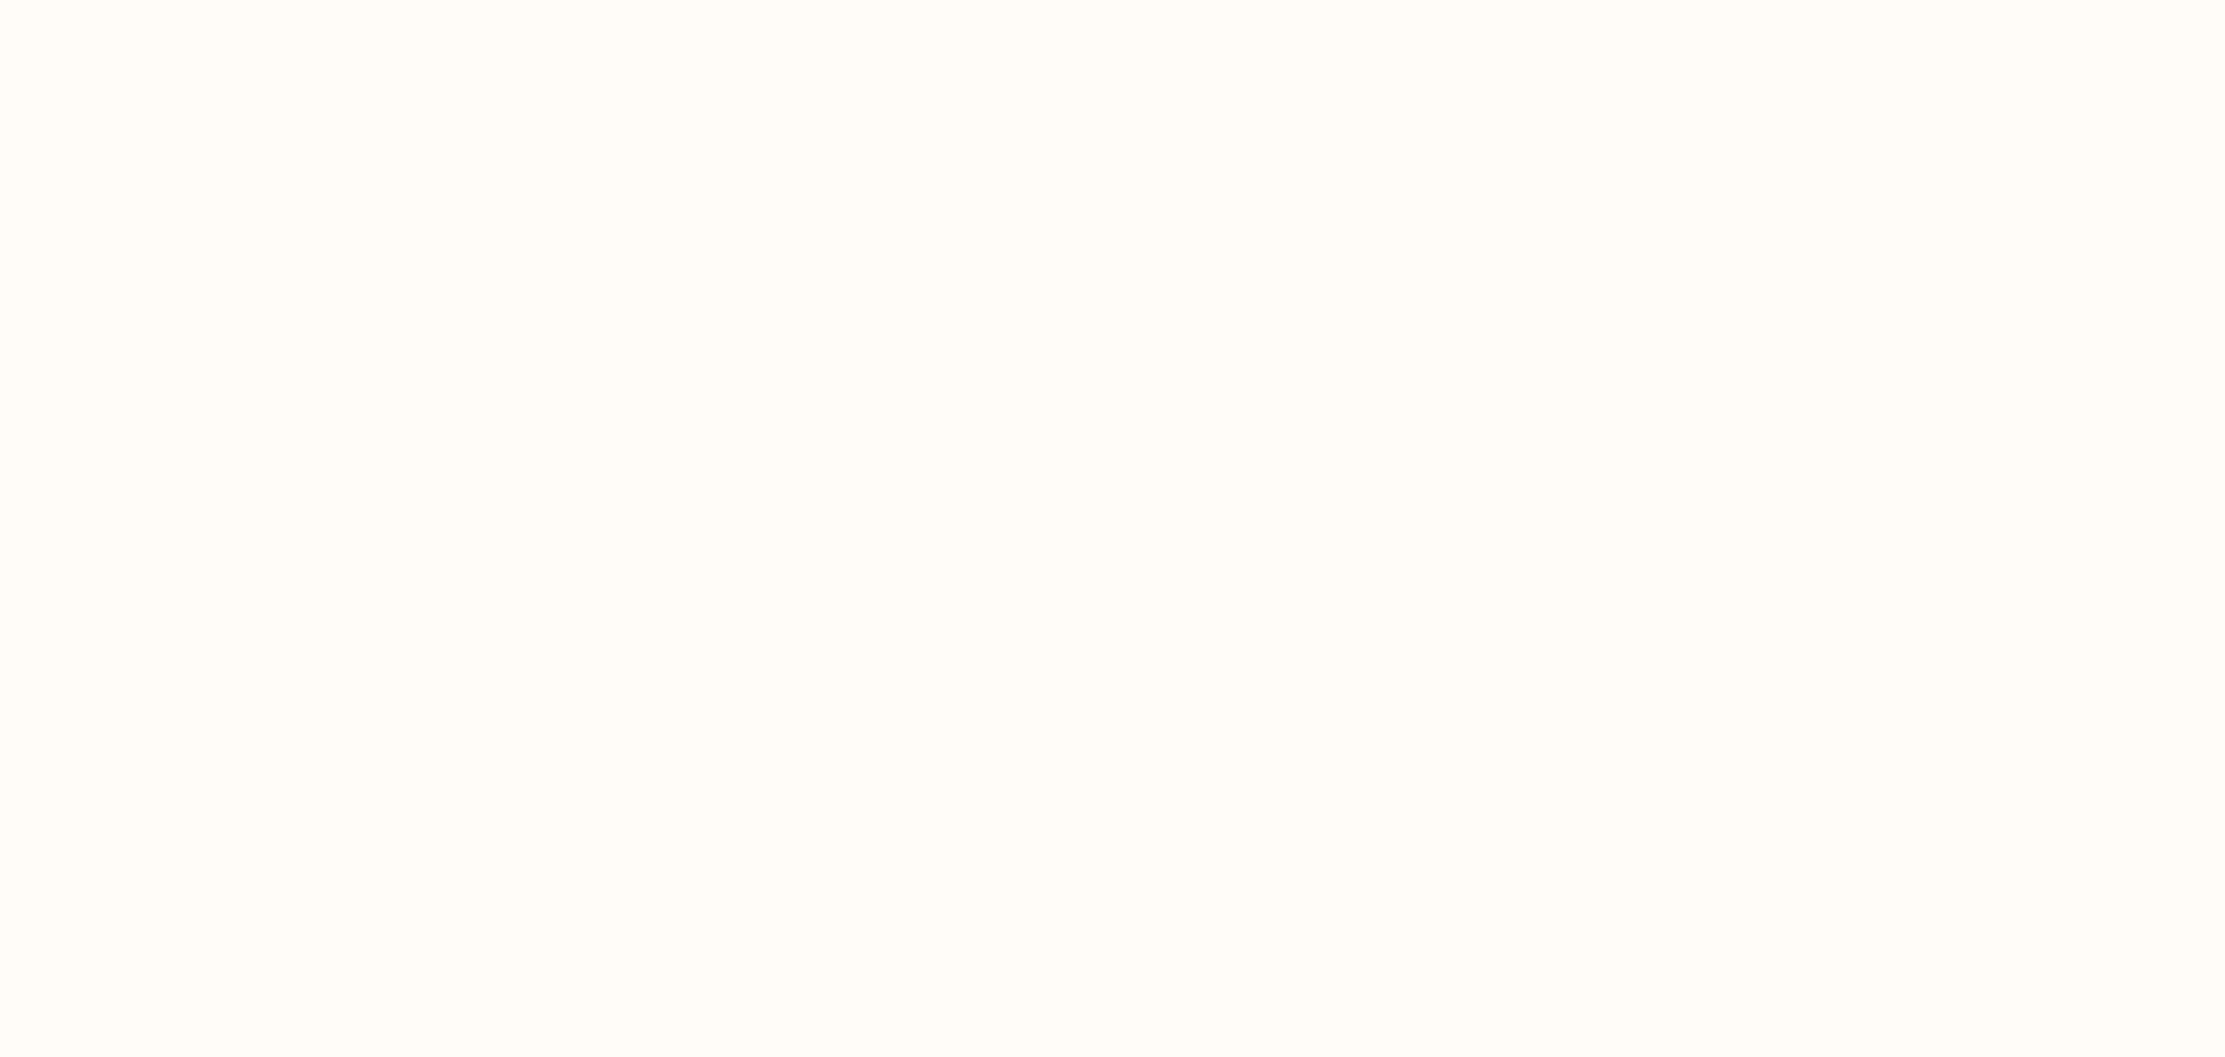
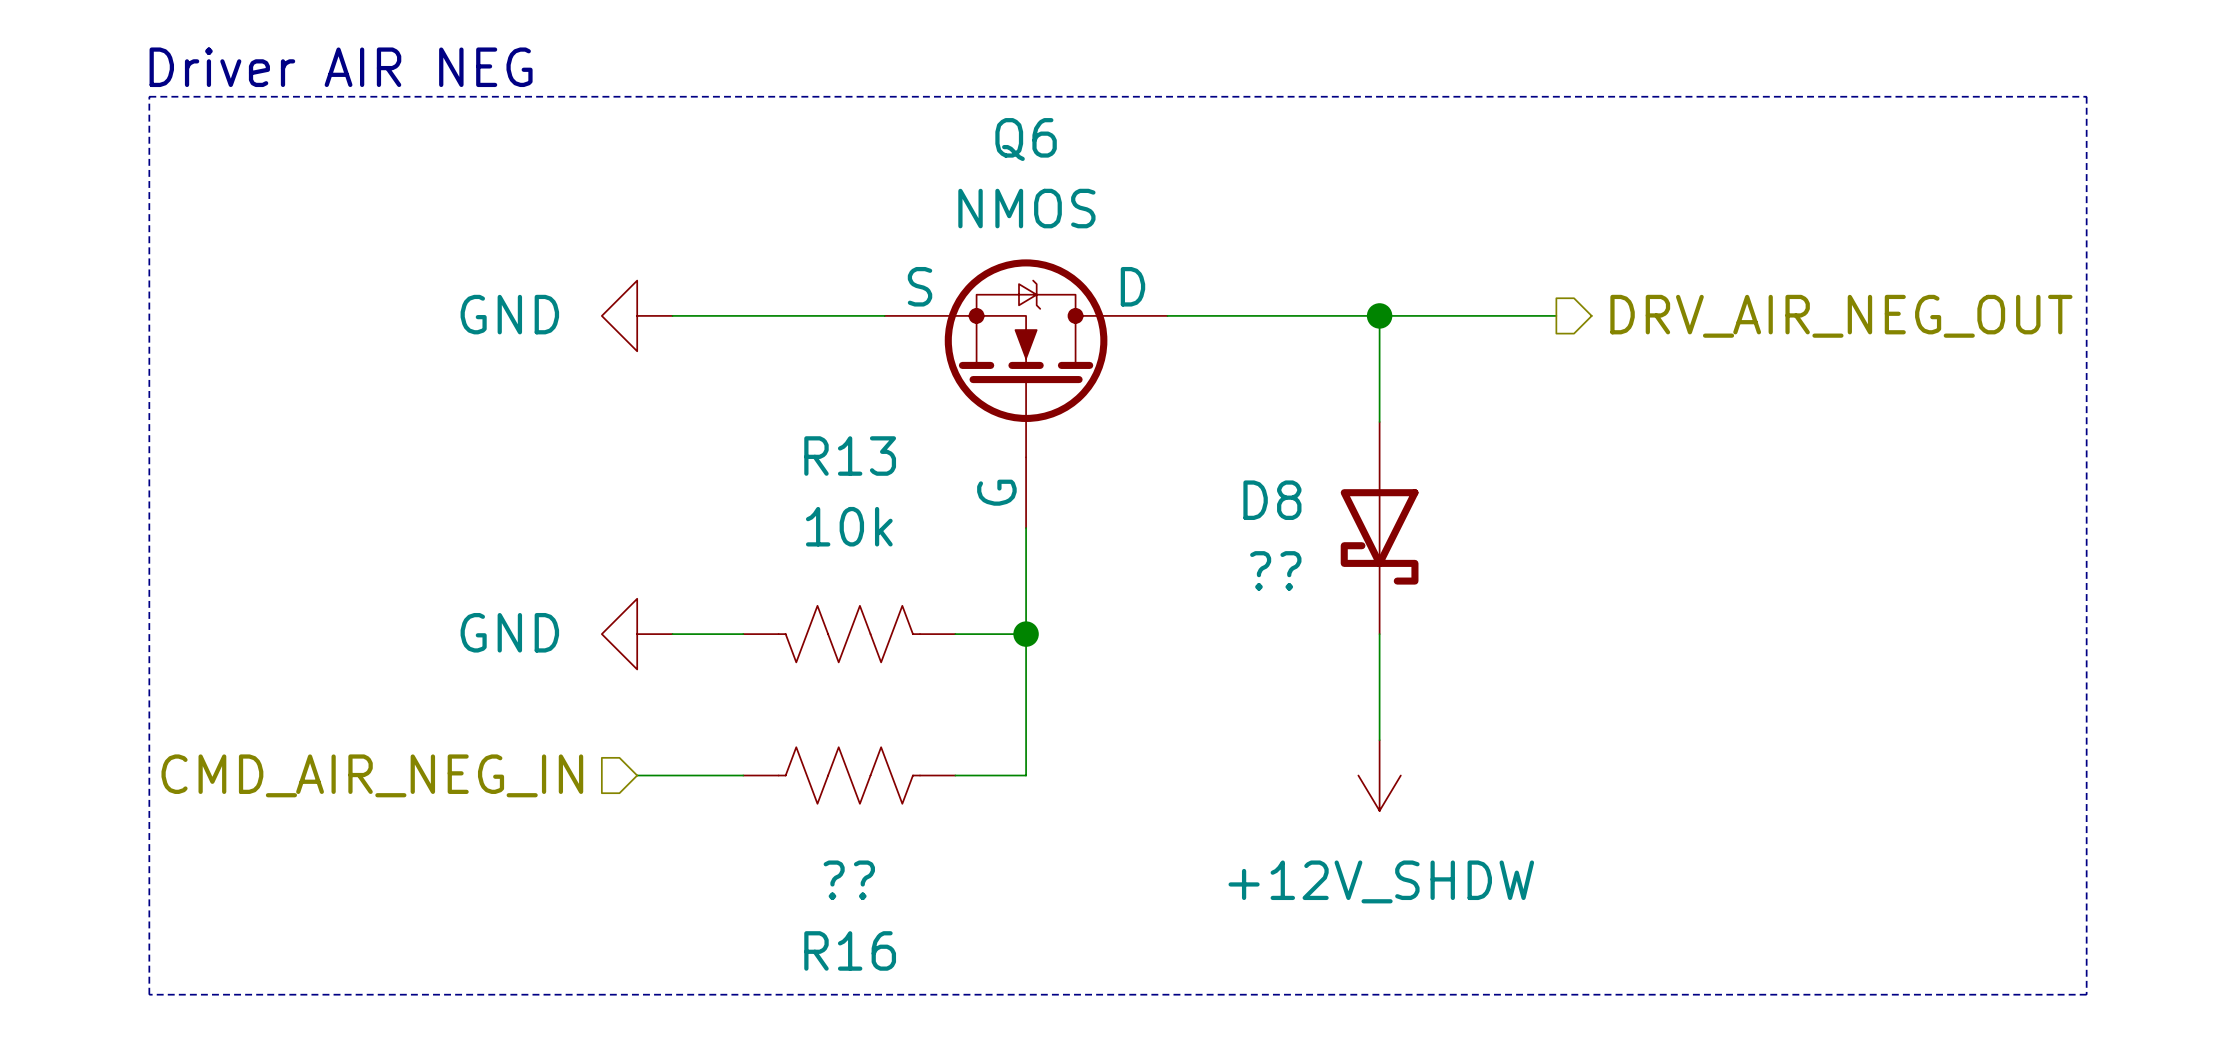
text: none -> Driver AIR NEG (341, 67)
line: none -> (149, 96) (2086, 96) (2086, 994) (149, 994) (149, 96)
power symbol: none -> GND (637, 315)
wire: none -> (672, 315) (884, 315)
wire: none -> (1167, 315) (1556, 315)
wire: none -> (1379, 315) (1379, 421)
junction: none -> (1379, 315)
hierarchical label: none -> DRV_AIR_NEG_OUT (1841, 316)
Q6: none -> NMOS (1026, 393)
wire: none -> (1026, 528) (1026, 775) (955, 775)
D8: none -> ?? (1379, 528)
power symbol: none -> GND (637, 634)
wire: none -> (672, 634) (743, 634)
R13: none -> 10k (849, 634)
wire: none -> (955, 634) (1026, 634)
junction: none -> (1026, 634)
wire: none -> (1379, 634) (1379, 740)
wire: none -> (637, 775) (743, 775)
R16: none -> ?? (849, 775)
power symbol: none -> +12V_SHDW (1379, 775)
hierarchical label: none -> CMD_AIR_NEG_IN (372, 775)

